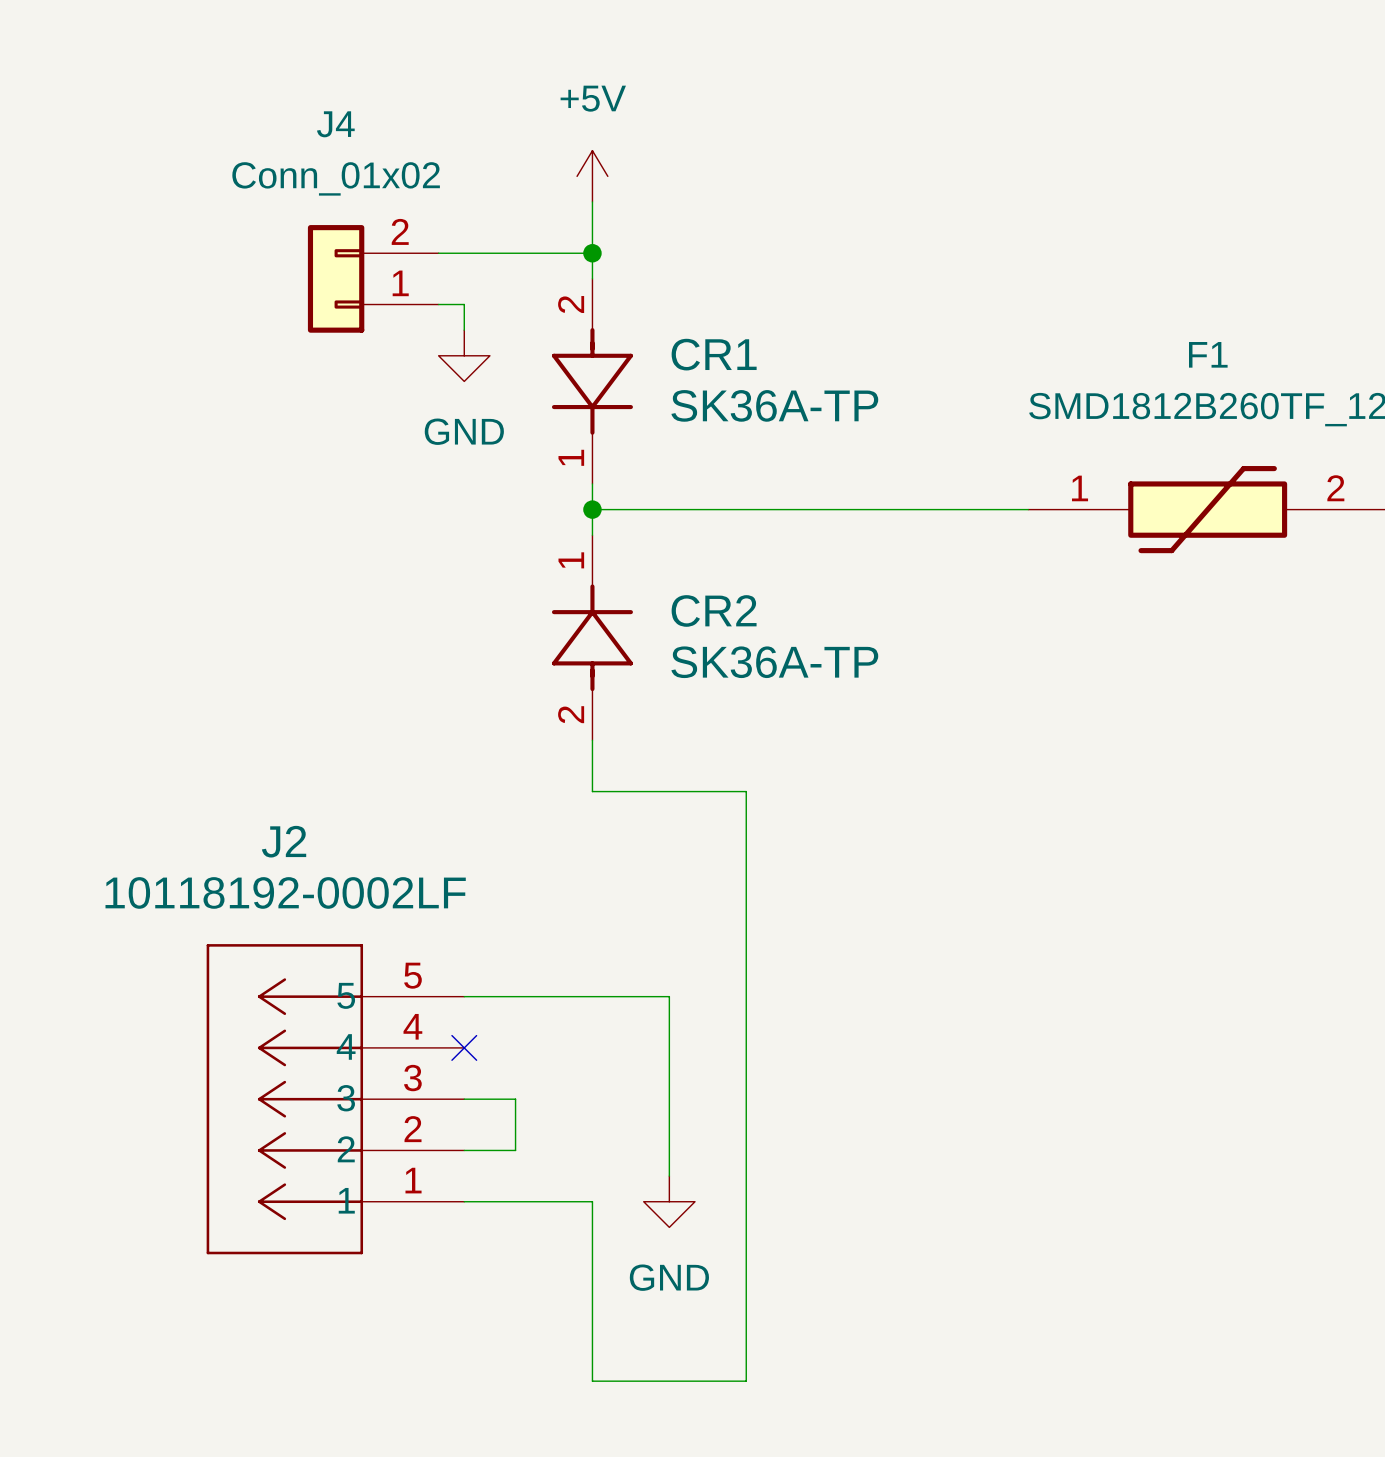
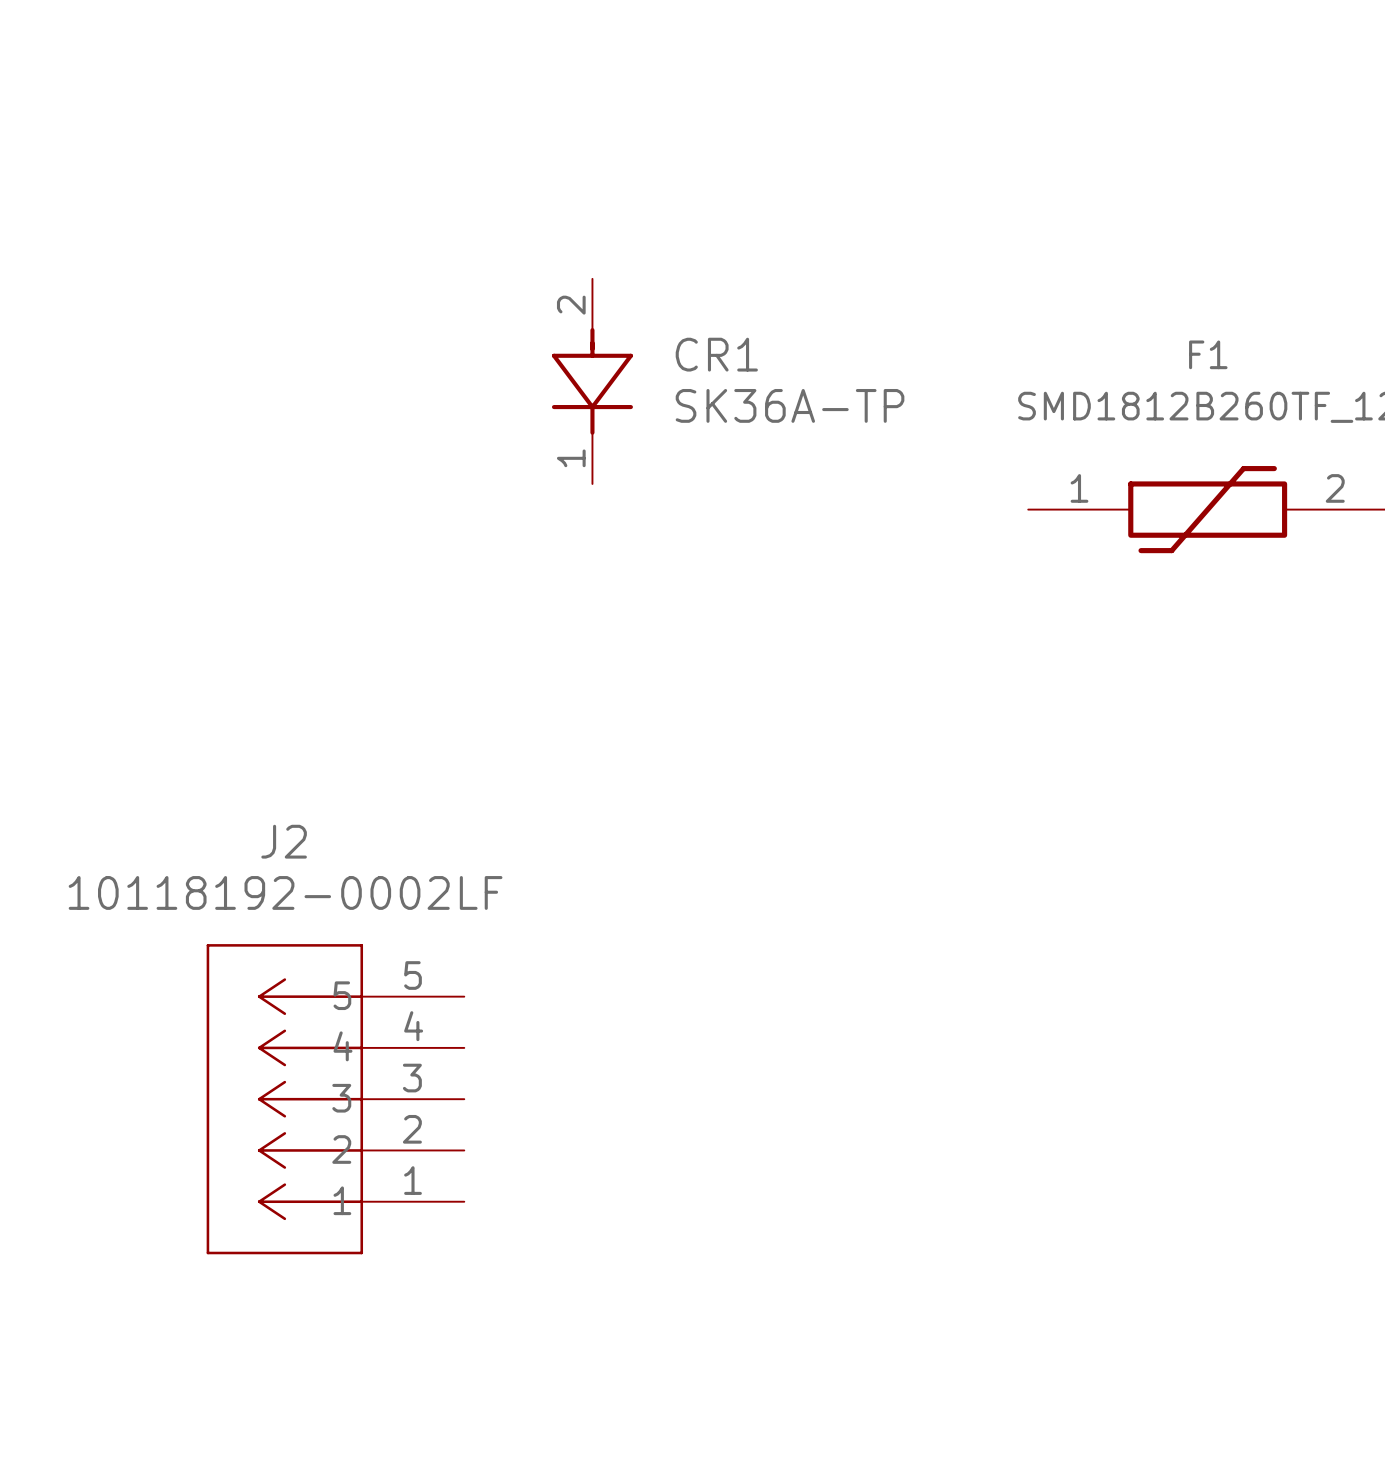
power symbol: +5V (592, 176) -> none
wire: (592, 201) (592, 278) -> none
wire: (438, 253) (592, 253) -> none
junction: (592, 253) -> none
J4: Conn_01x02 (373, 278) -> none
wire: (438, 304) (464, 304) (464, 330) -> none
power symbol: GND (464, 355) -> none
wire: (592, 483) (592, 535) -> none
wire: (592, 509) (1028, 509) -> none
junction: (592, 509) -> none
CR2: SK36A-TP (592, 637) -> none
wire: (592, 740) (592, 791) (746, 791) (746, 1381) (592, 1381) (592, 1201) (464, 1201) -> none
wire: (464, 996) (669, 996) (669, 1176) -> none
no-connect mark: (464, 1047) -> none
wire: (464, 1099) (515, 1099) (515, 1150) (464, 1150) -> none
power symbol: GND (669, 1201) -> none

